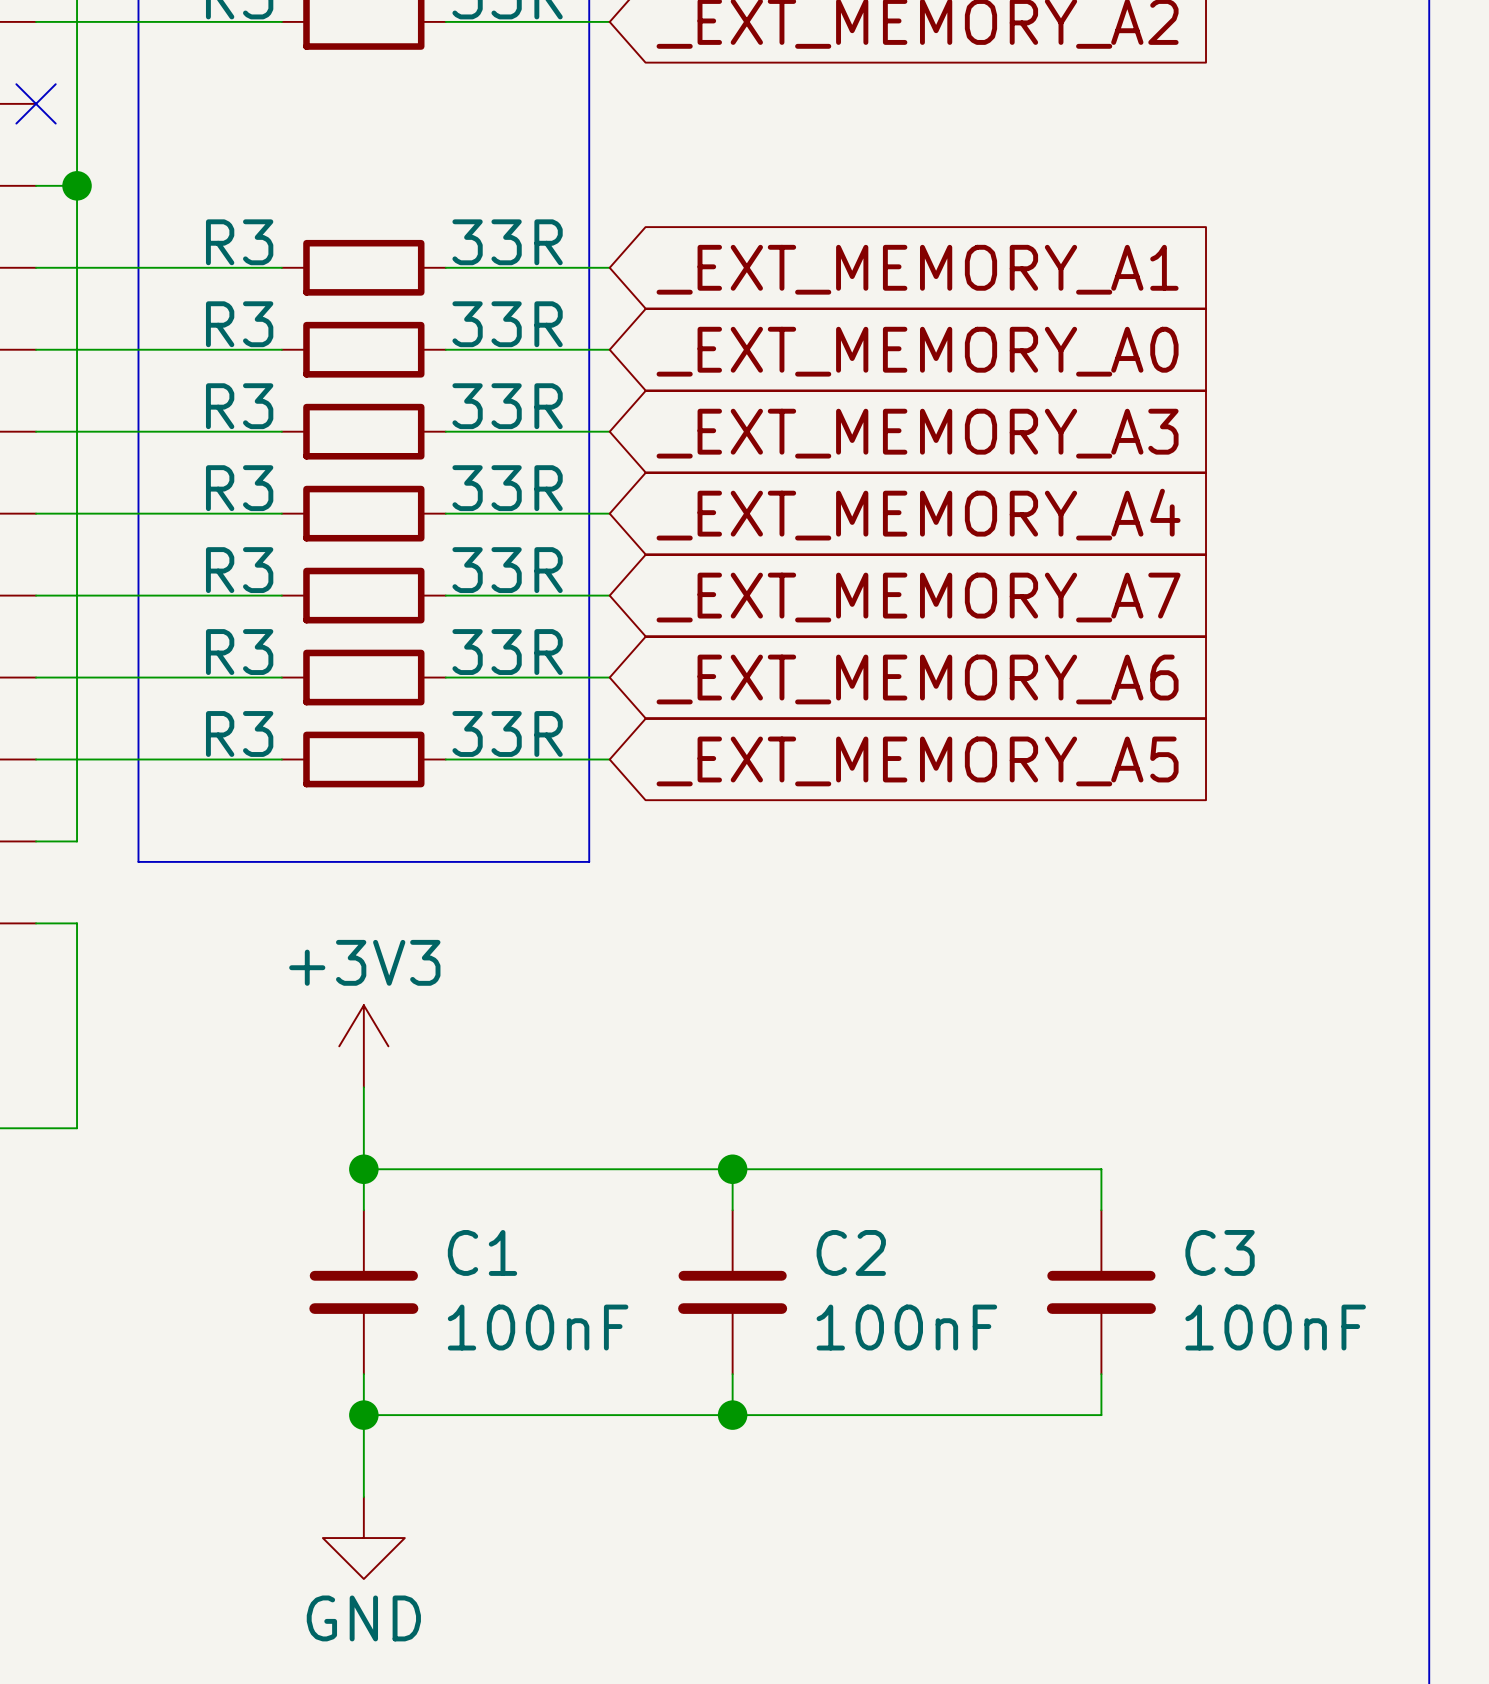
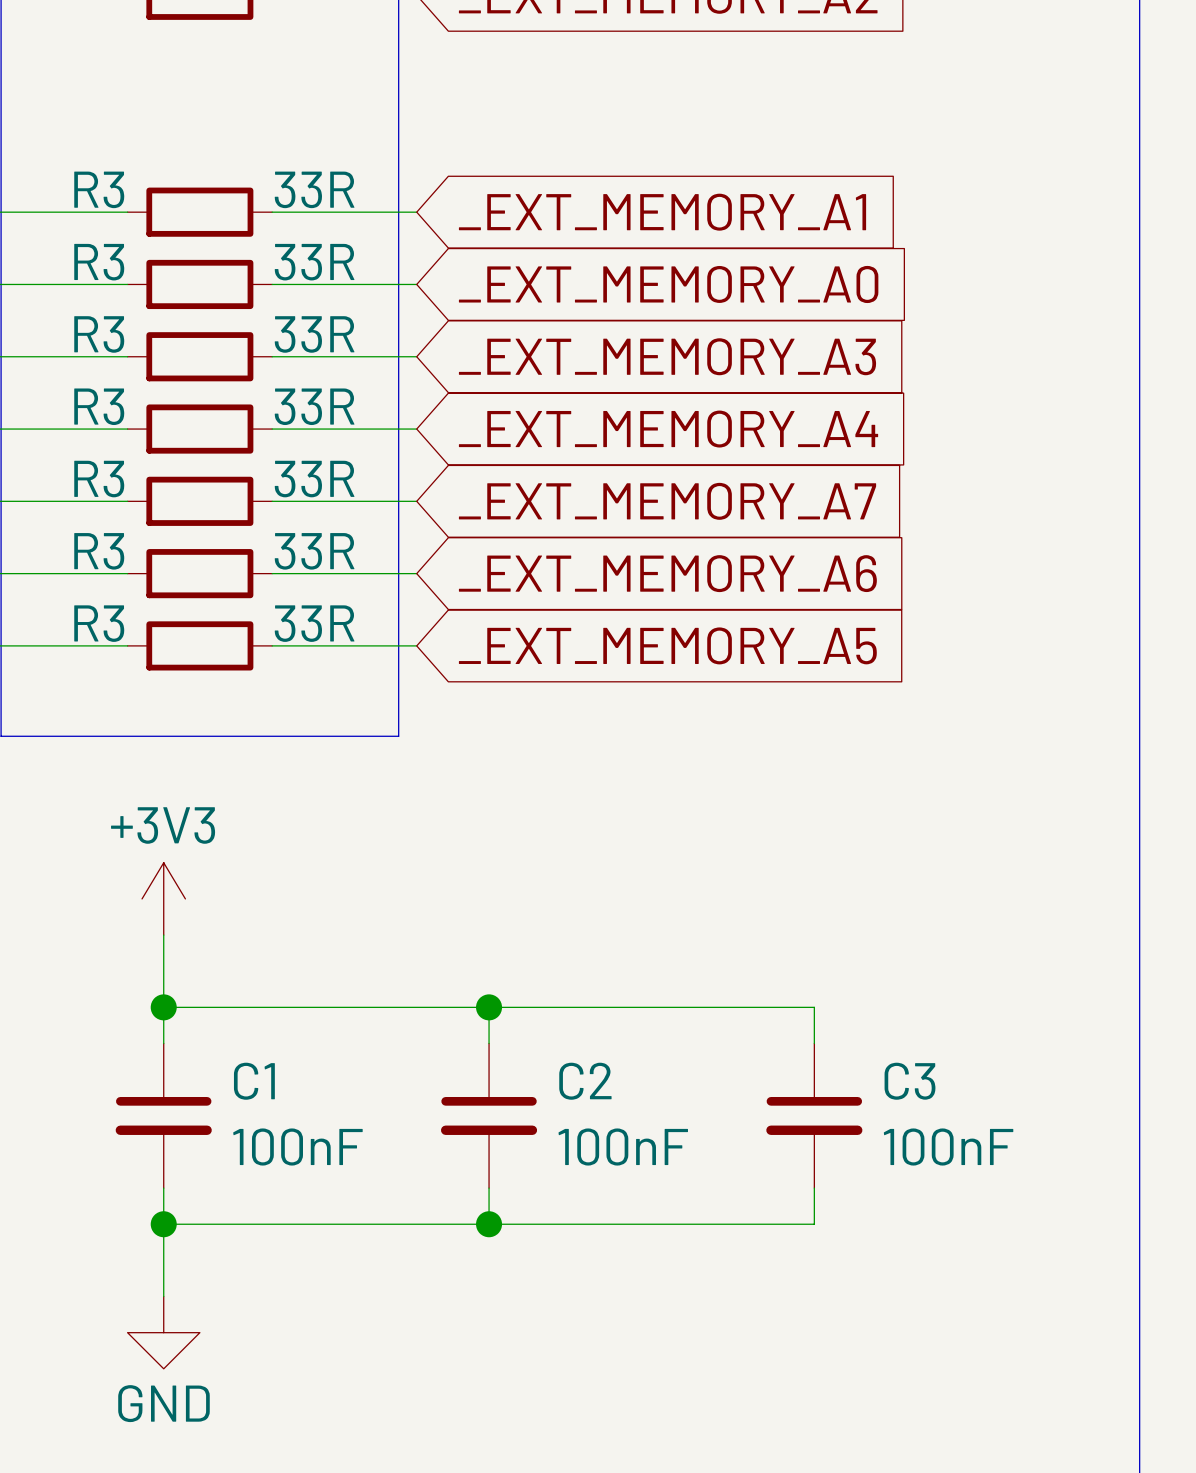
power symbol position: +3V3 (363, 1046) -> +3V3 (163, 898)
wire: (363, 1087) (363, 1210) -> (163, 935) (163, 1043)
wire: none -> (163, 1007) (199, 1007)
junction position: (363, 1169) -> (163, 1007)
wire: (732, 1169) (732, 1210) -> (489, 1007) (489, 1043)
junction position: (732, 1169) -> (489, 1007)
wire: (1060, 1169) (1101, 1169) (1101, 1210) -> (814, 1007) (814, 1043)
C1 position: (363, 1292) -> (163, 1115)
C2 position: (732, 1292) -> (489, 1115)
C3 position: (1101, 1292) -> (814, 1115)
wire: (363, 1374) (363, 1497) -> (163, 1188) (163, 1296)
wire: (732, 1374) (732, 1415) -> (489, 1188) (489, 1224)
wire: (1101, 1374) (1101, 1415) (1060, 1415) -> (814, 1188) (814, 1224)
wire: none -> (163, 1224) (199, 1224)
junction position: (363, 1415) -> (163, 1224)
junction position: (732, 1415) -> (489, 1224)
power symbol position: GND (363, 1538) -> GND (163, 1332)

